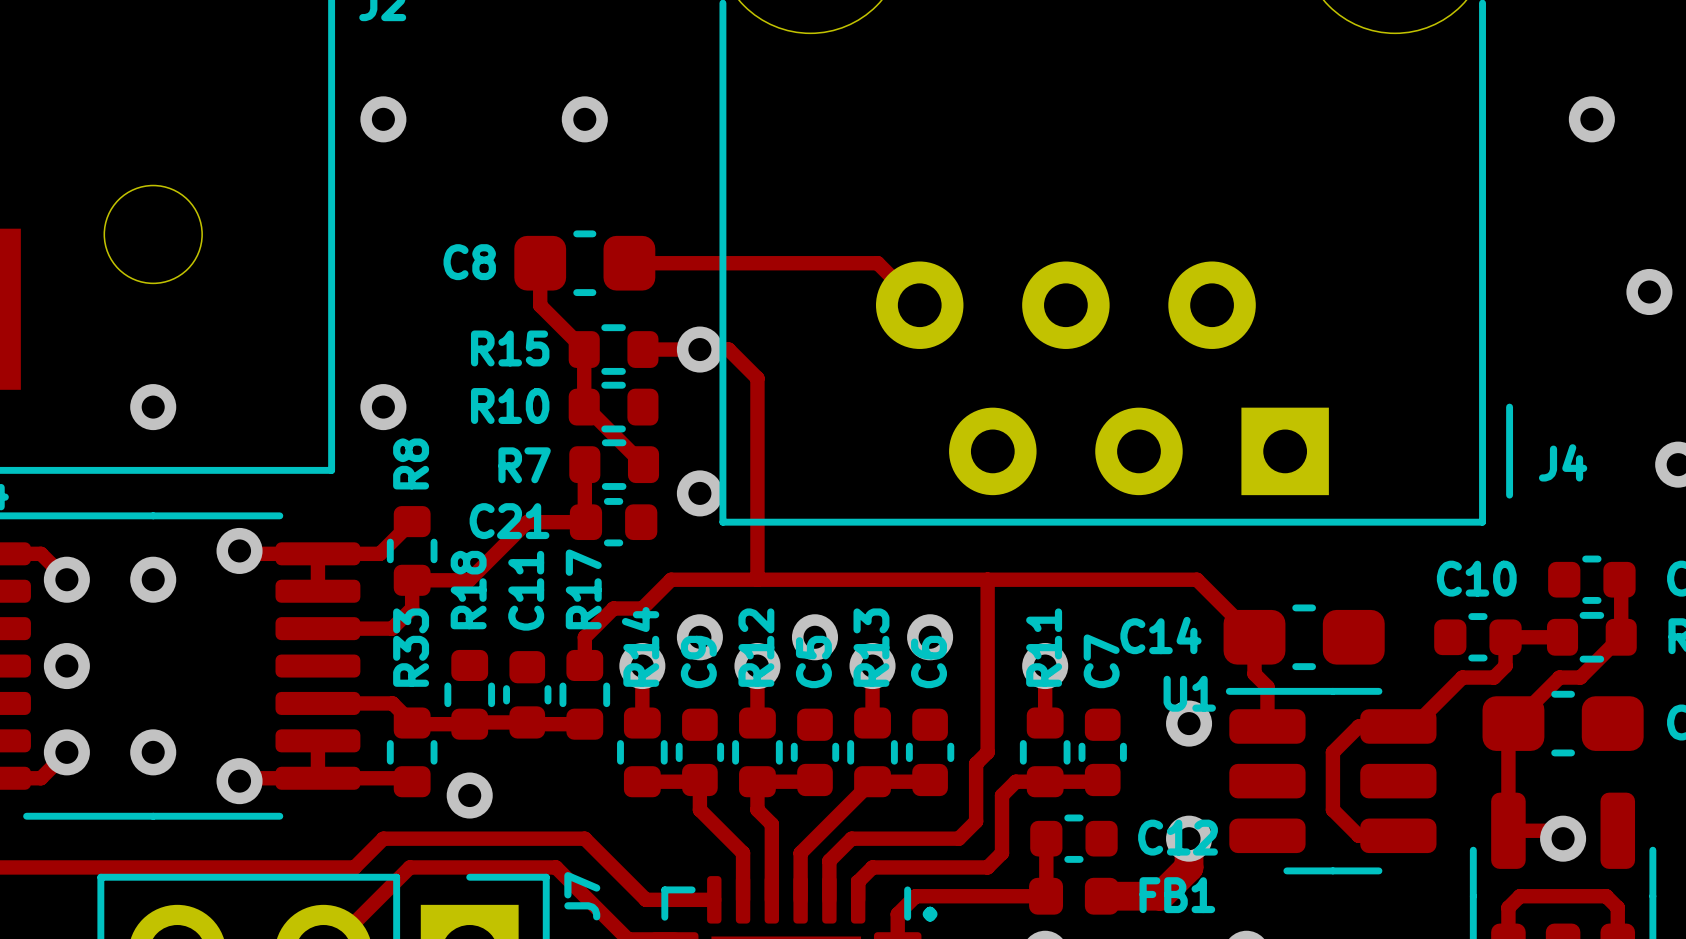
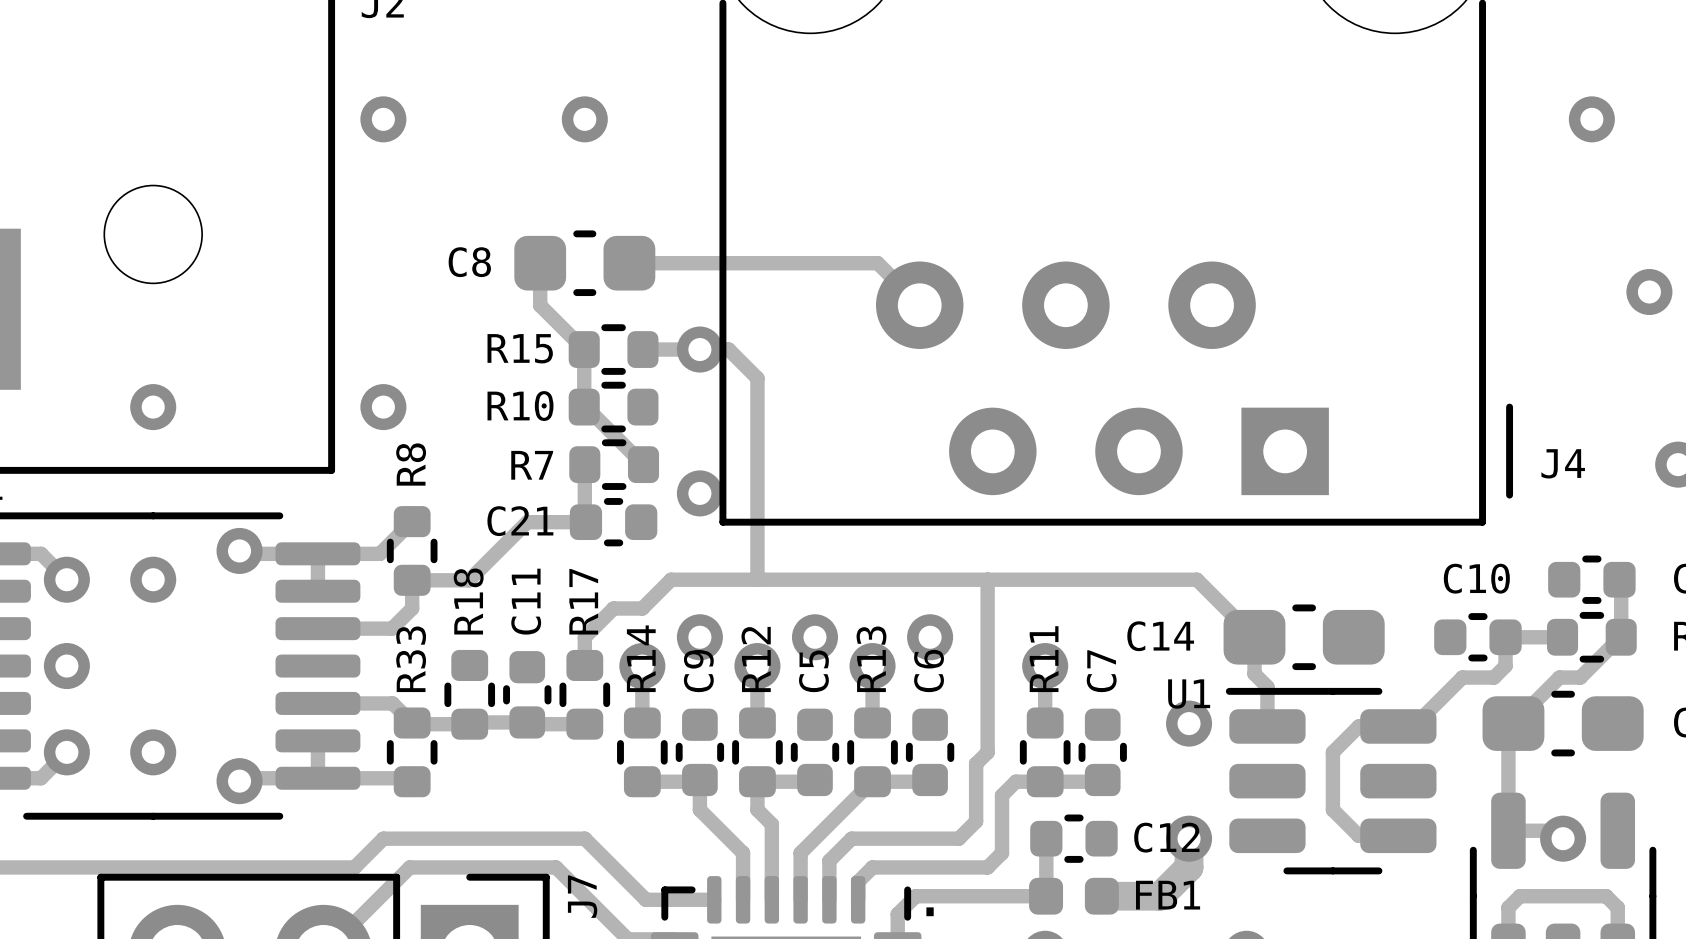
via: (469, 795) -> none

